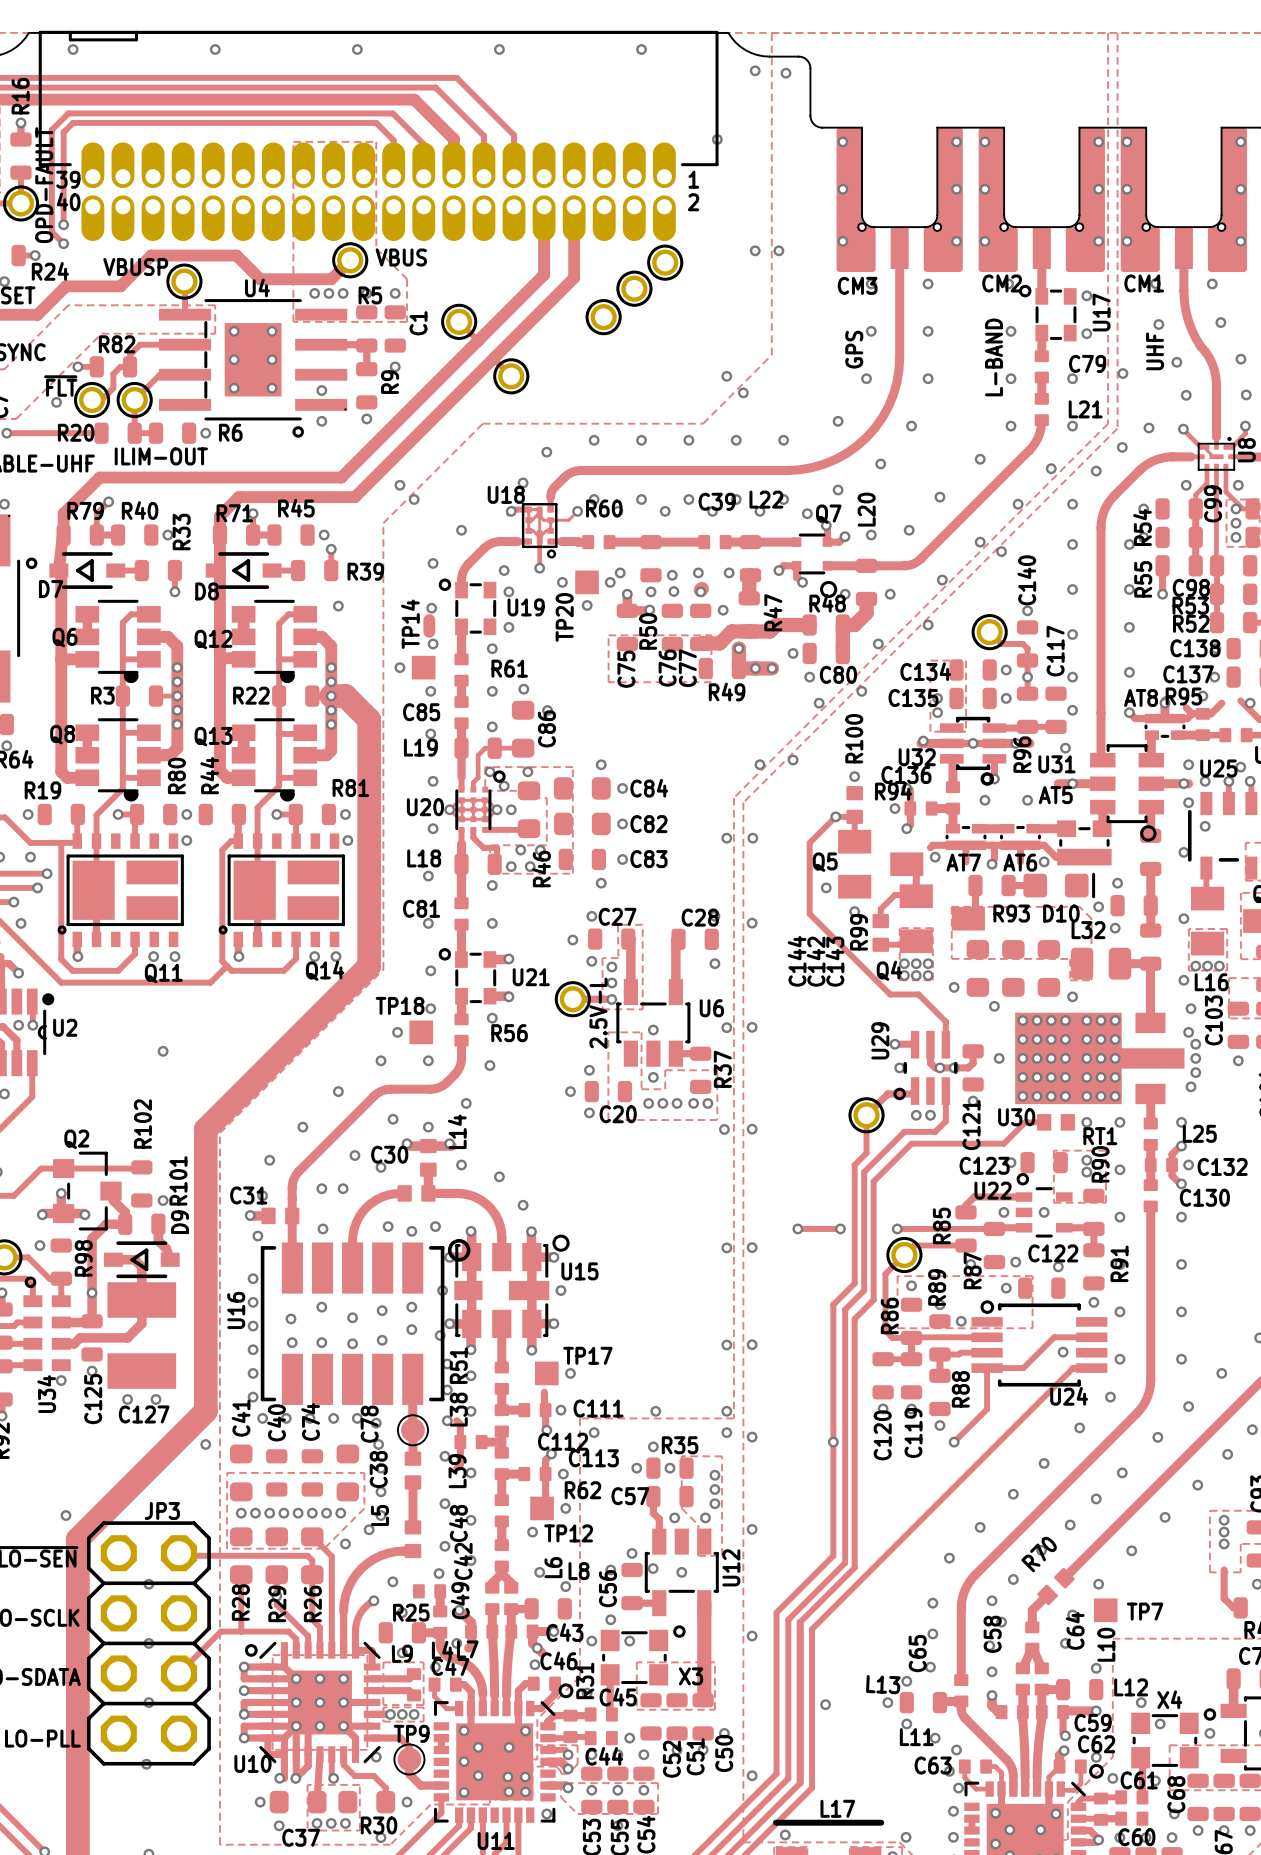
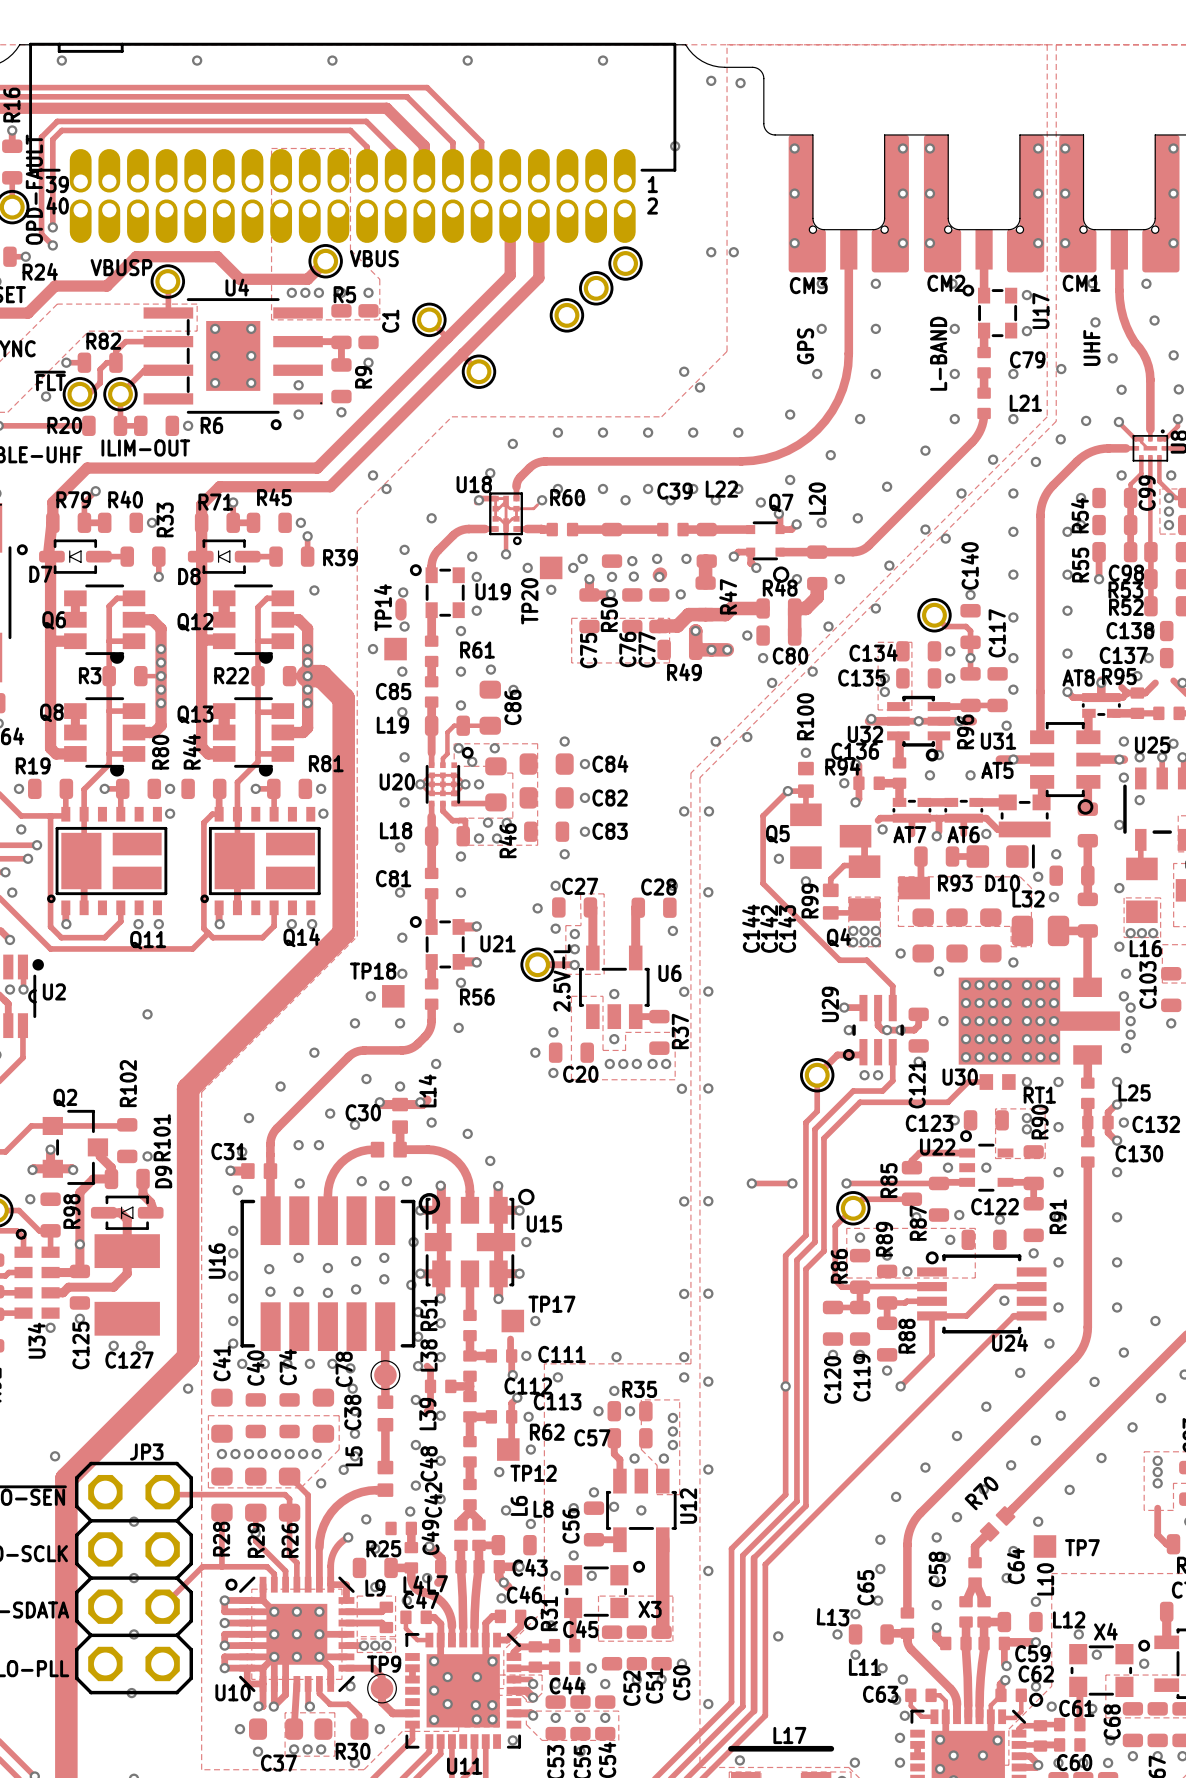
D7 footprint: [49, 552, 126, 589] -> [39, 539, 112, 574]
D8 footprint: [205, 552, 282, 589] -> [187, 539, 261, 574]
track: none -> (427, 1100) (422, 1104)
D9 footprint: [103, 1241, 180, 1279] -> [90, 1195, 164, 1230]

